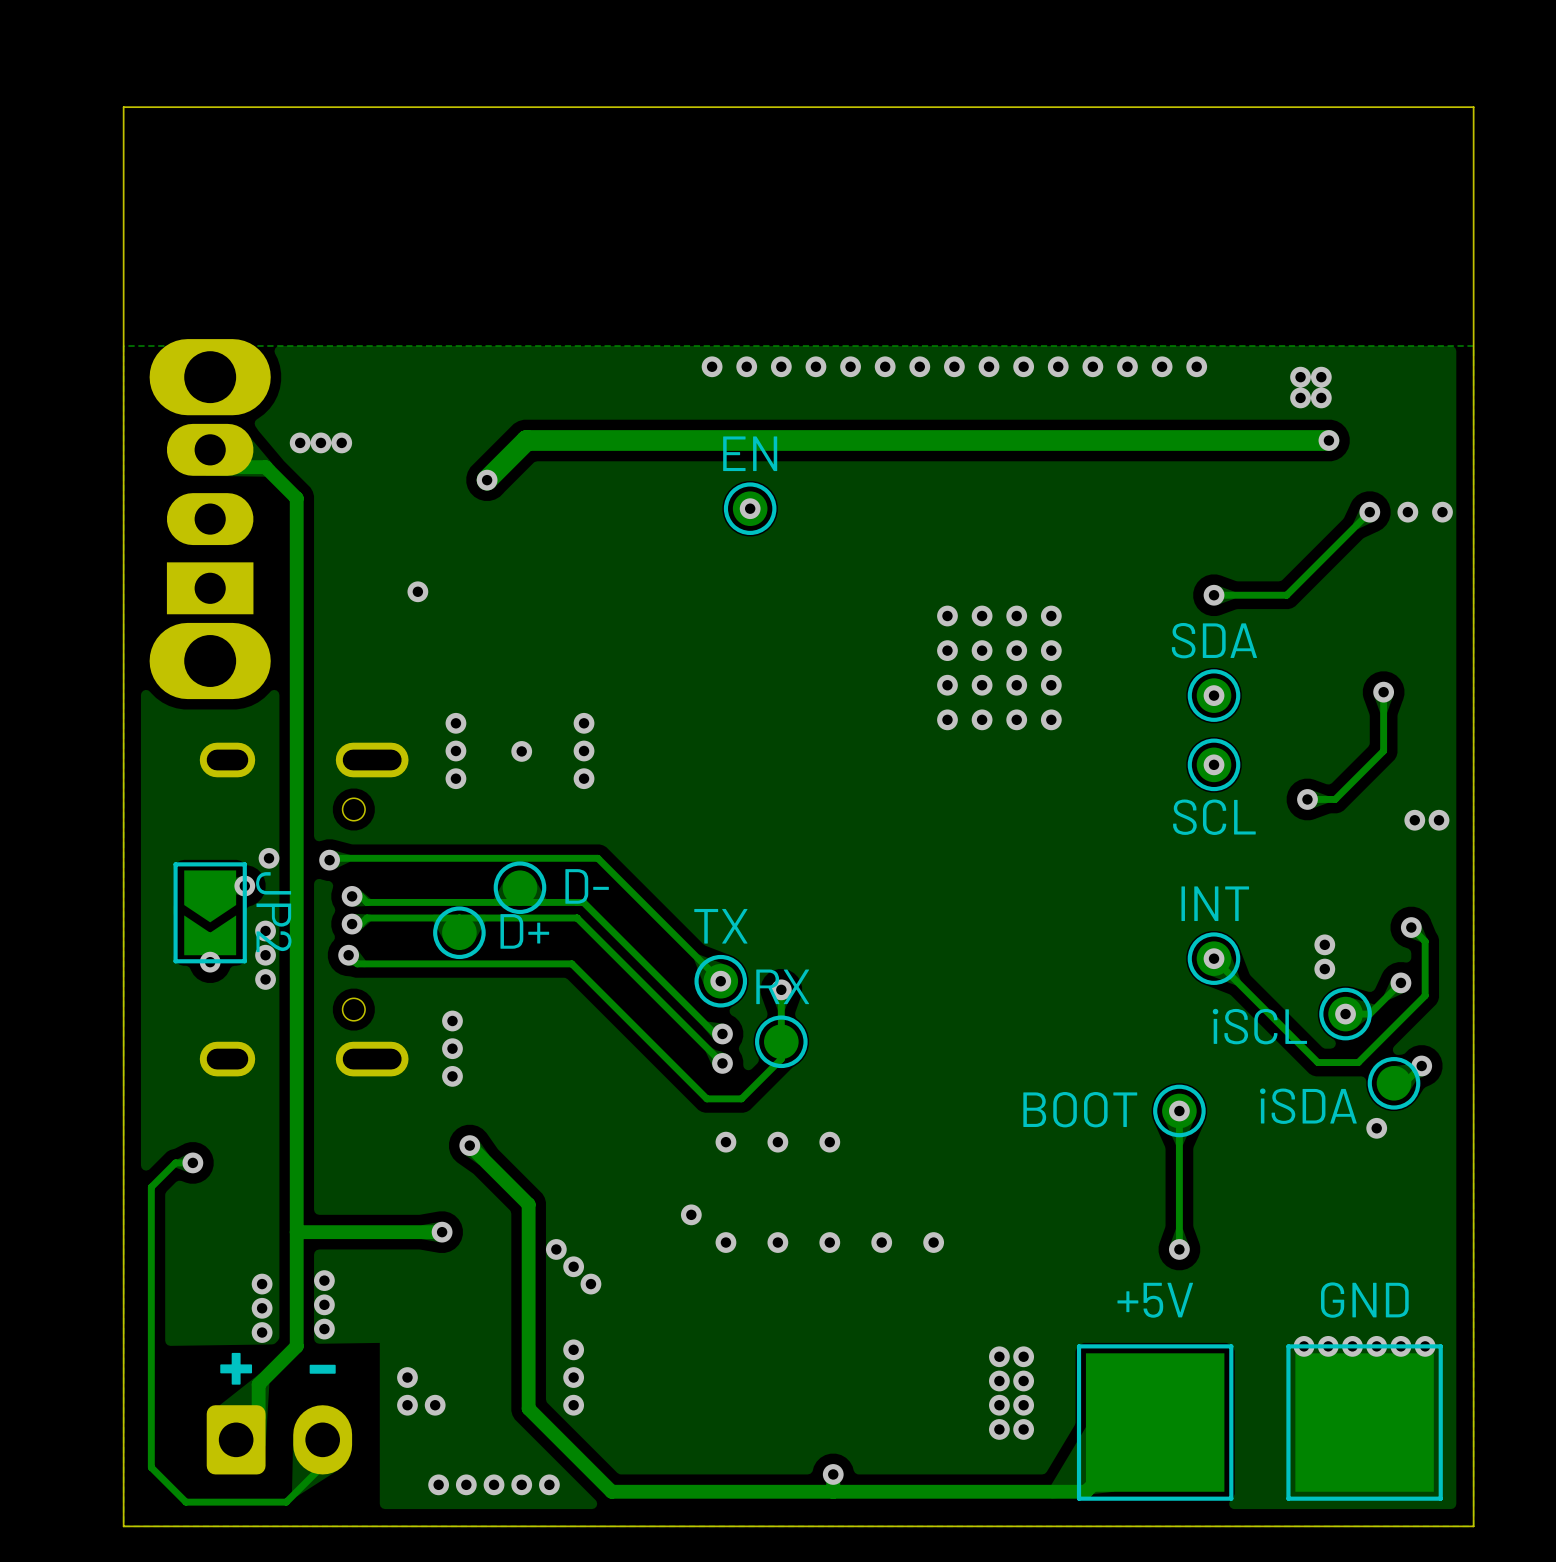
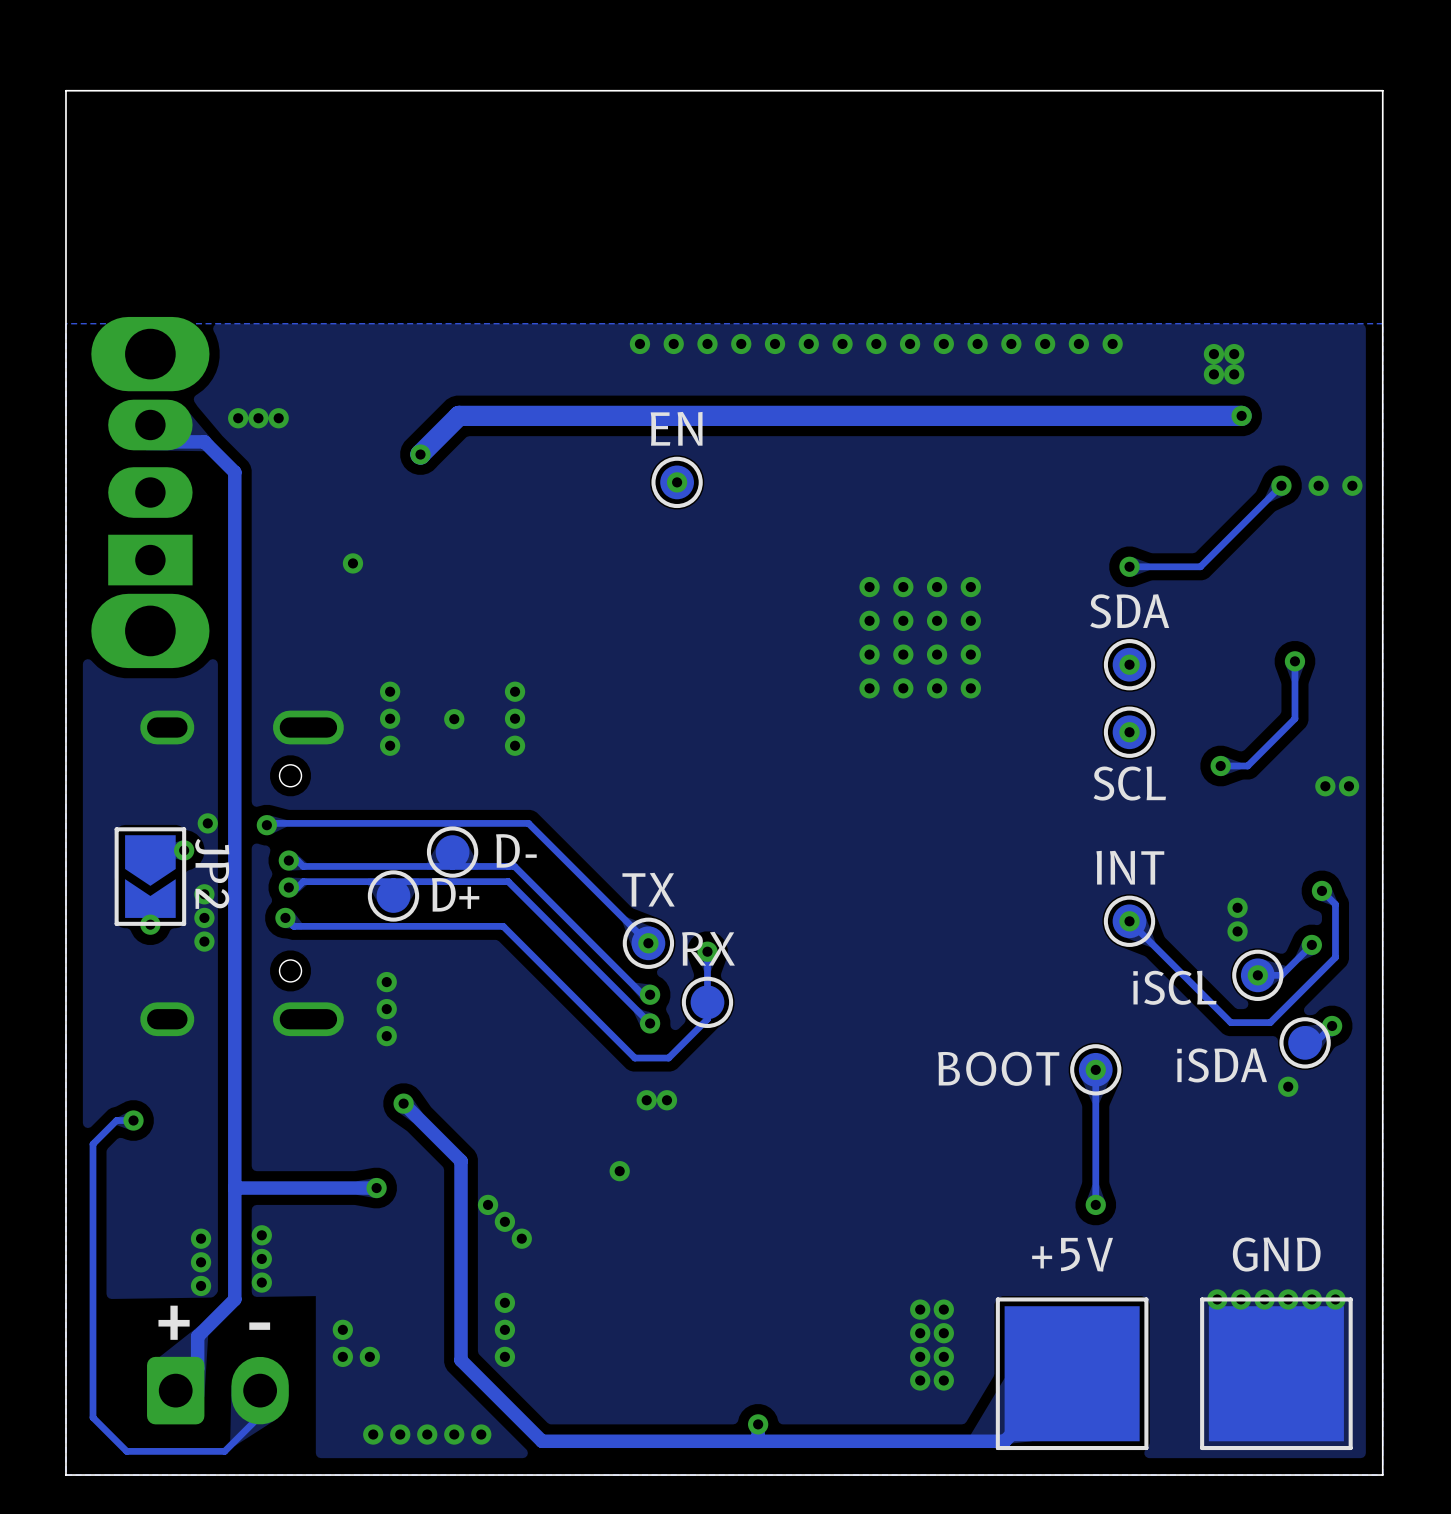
via: none -> (646, 1100)
via: (725, 1142) -> none
via: none -> (666, 1100)
via: (777, 1142) -> none
via: (829, 1142) -> none
via: (725, 1242) -> none
via: (777, 1242) -> none
via: (829, 1242) -> none
via: (881, 1242) -> none
via: (933, 1242) -> none

